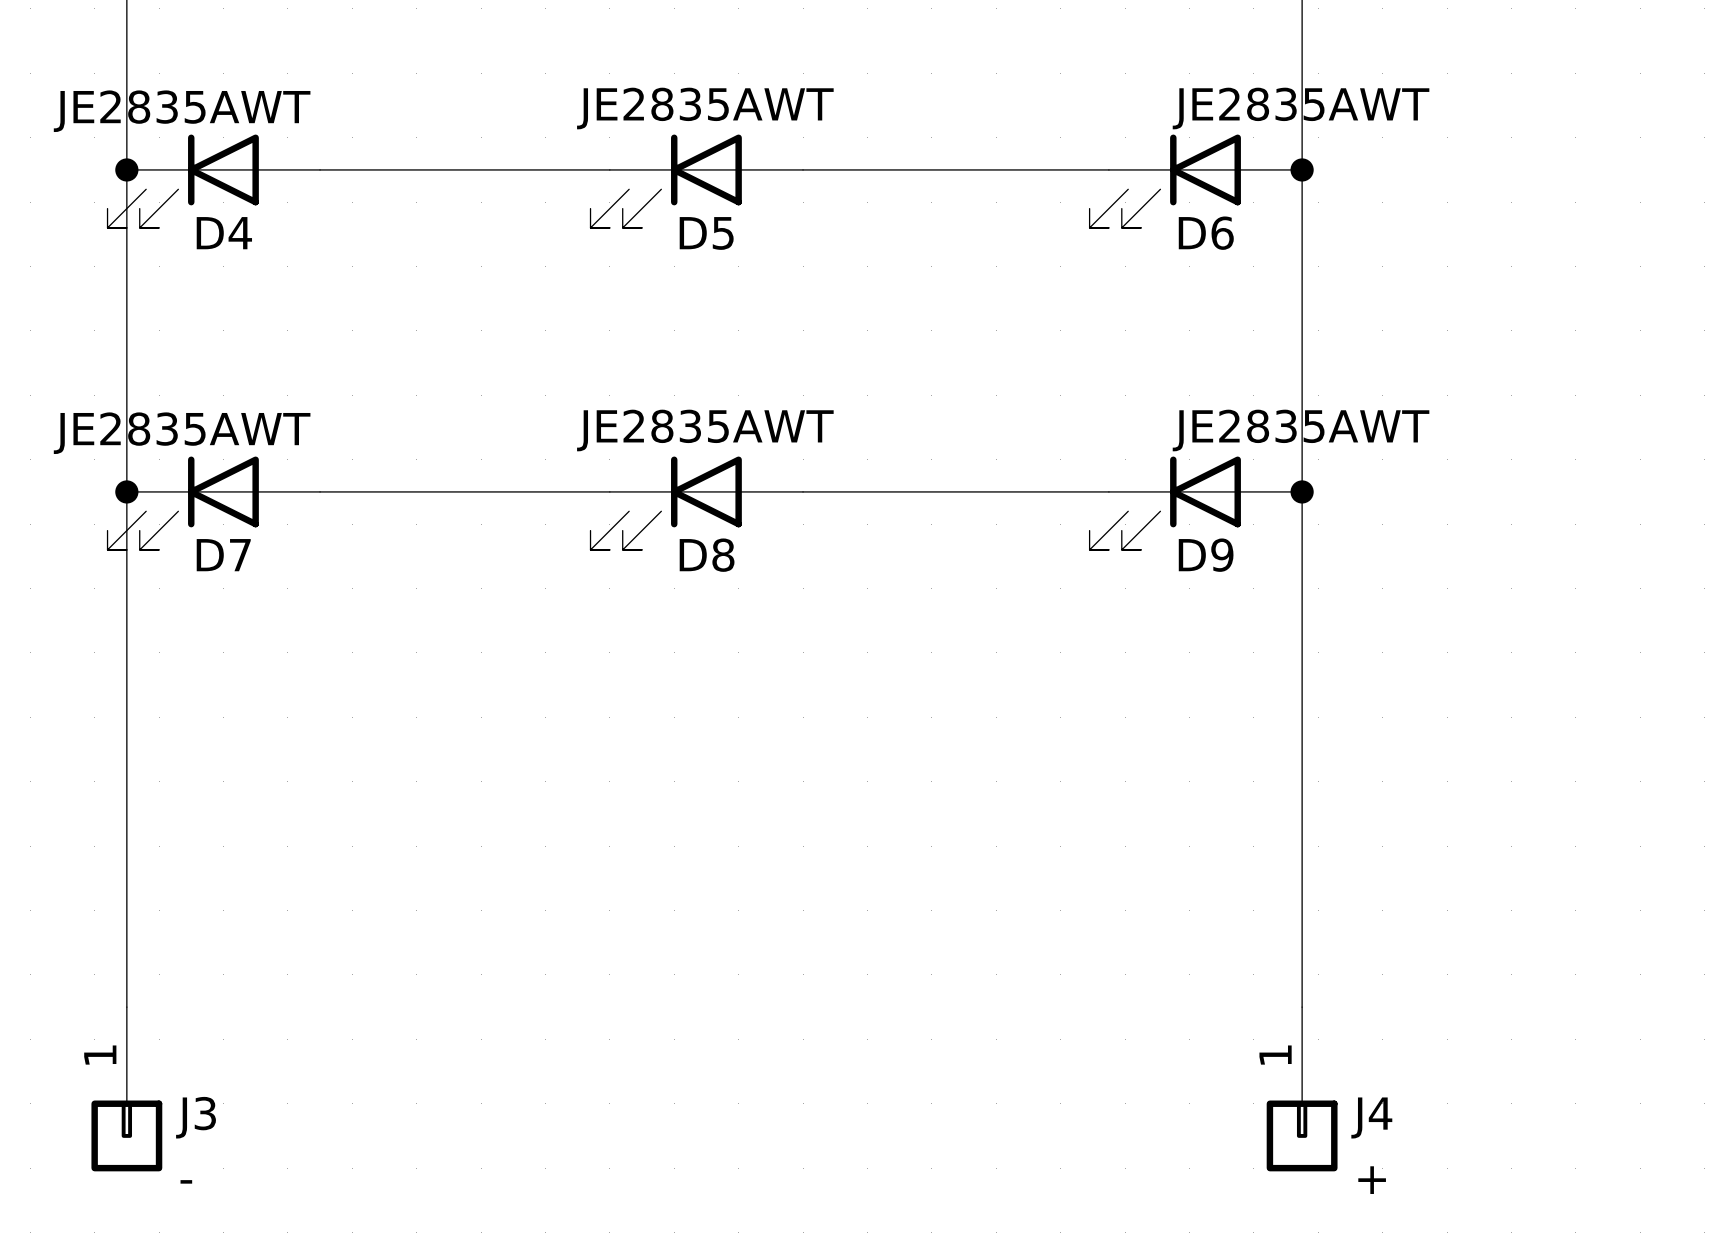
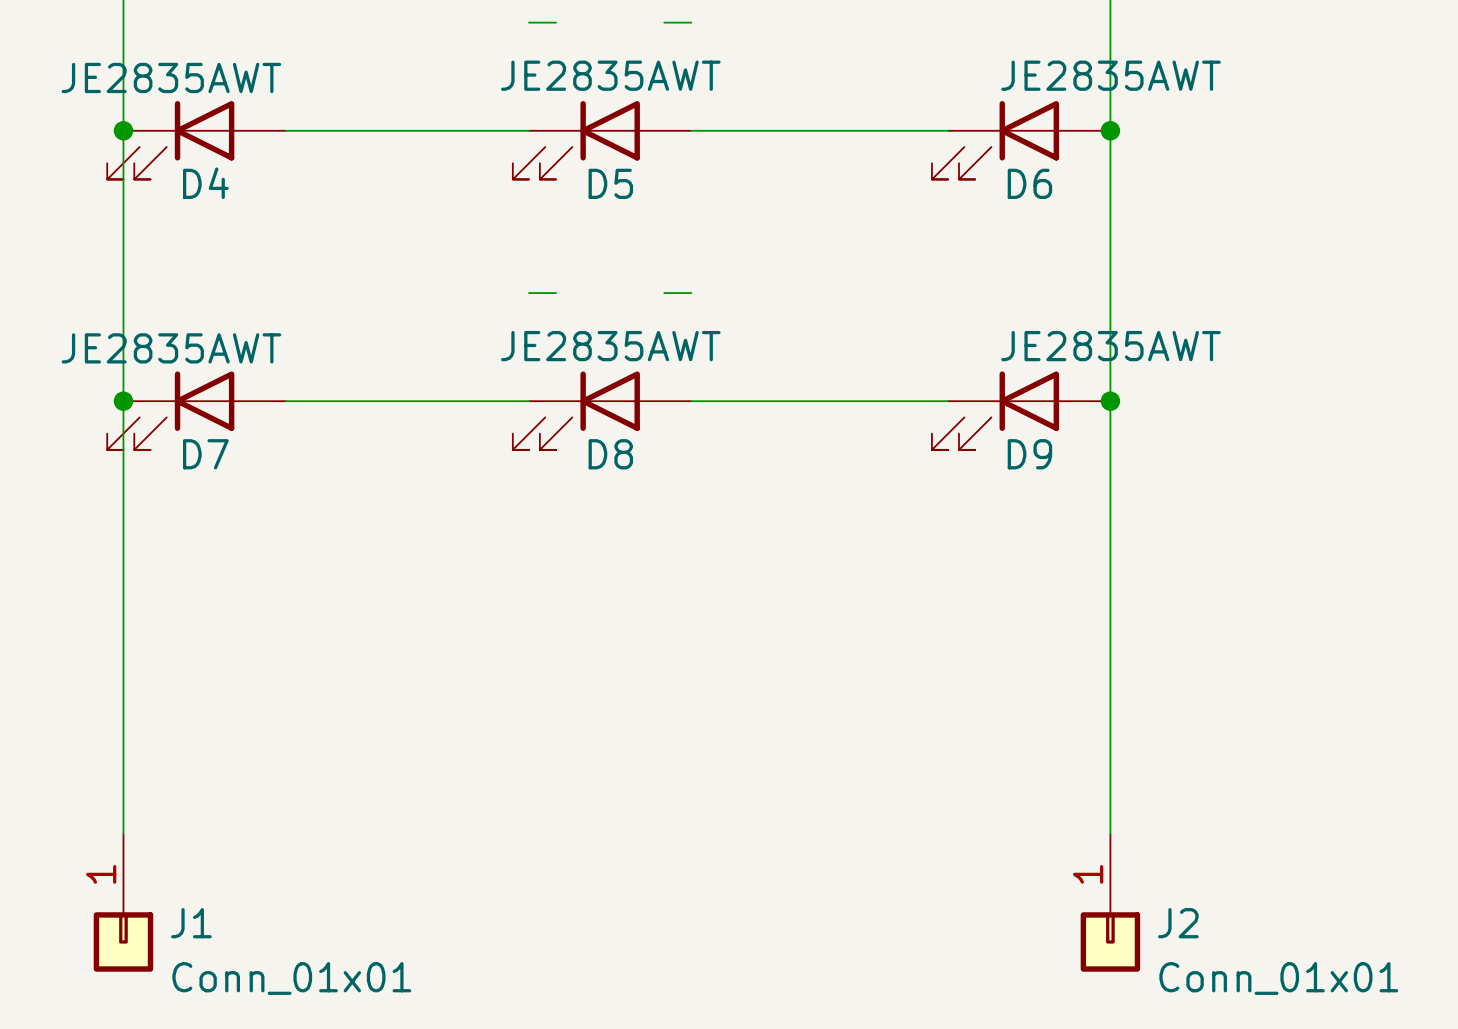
wire: none -> (529, 22) (556, 22)
wire: none -> (664, 22) (691, 22)
wire: none -> (529, 293) (556, 293)
wire: none -> (664, 293) (691, 293)
J3 name: J3 (196, 1117) -> J1 (191, 923)
J4 name: J4 (1371, 1117) -> J2 (1178, 923)
J4 value: + (1372, 1180) -> Conn_01x01 (1278, 978)
J3 value: - (186, 1181) -> Conn_01x01 (291, 978)

